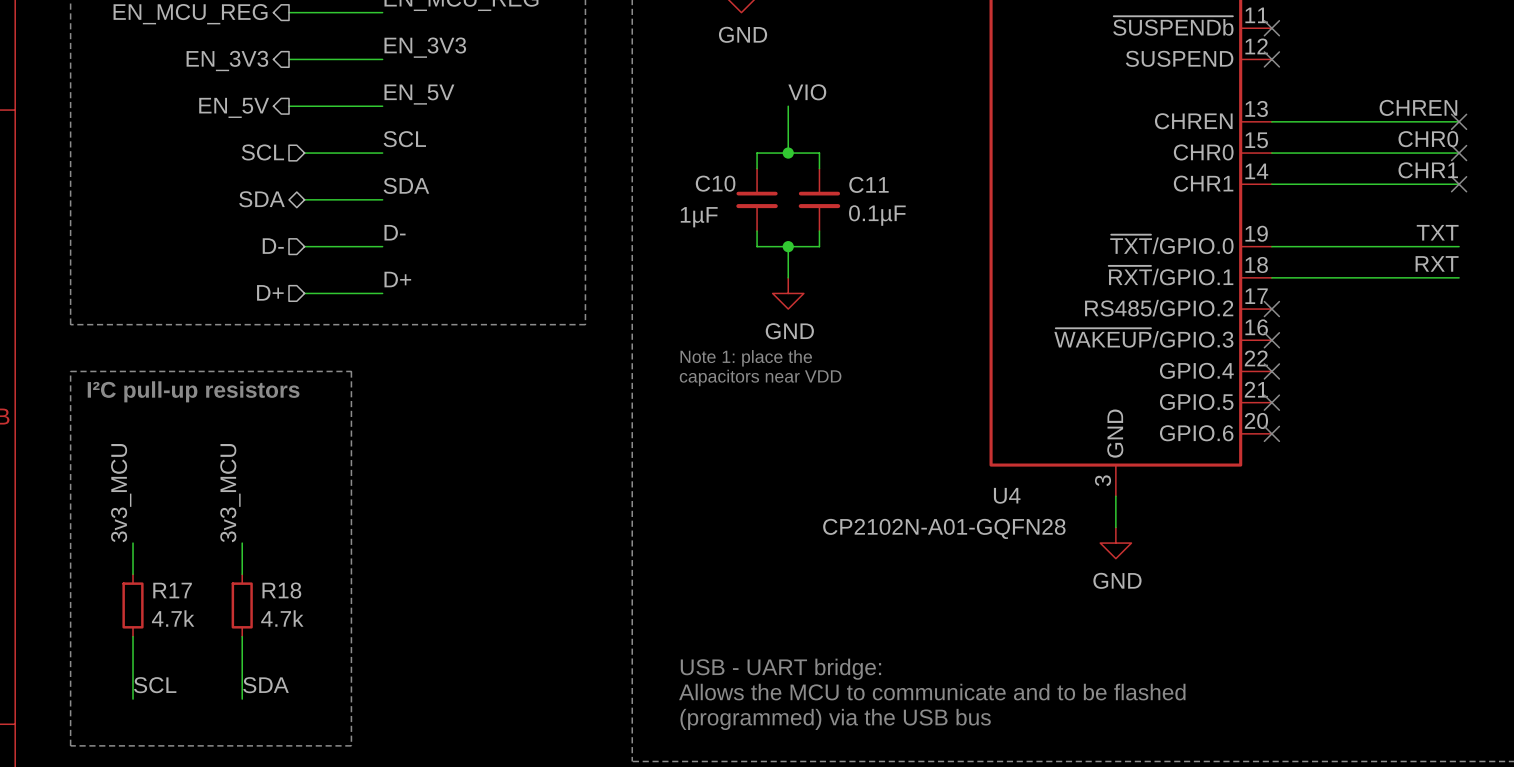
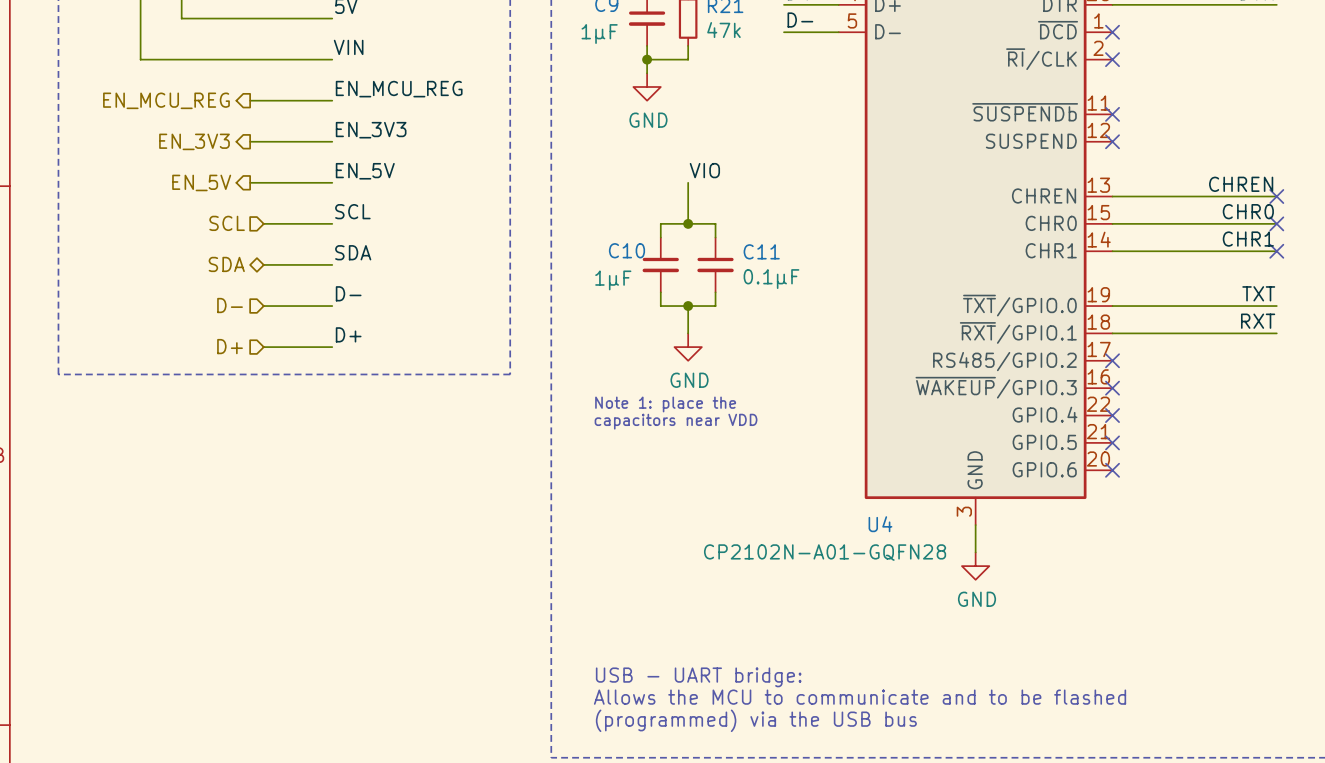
line: (70, 371) (351, 371) (351, 745) (70, 745) (70, 371) -> none
text: I²C pull-up resistors (193, 391) -> none
label: 3v3_MCU (121, 493) -> none
label: 3v3_MCU (230, 493) -> none
wire: (133, 543) (133, 574) -> none
wire: (242, 543) (242, 574) -> none
R17: 4.7k (133, 605) -> none
R18: 4.7k (242, 605) -> none
wire: (133, 636) (133, 699) -> none
wire: (242, 636) (242, 699) -> none
label: SCL (155, 685) -> none
label: SDA (266, 685) -> none

